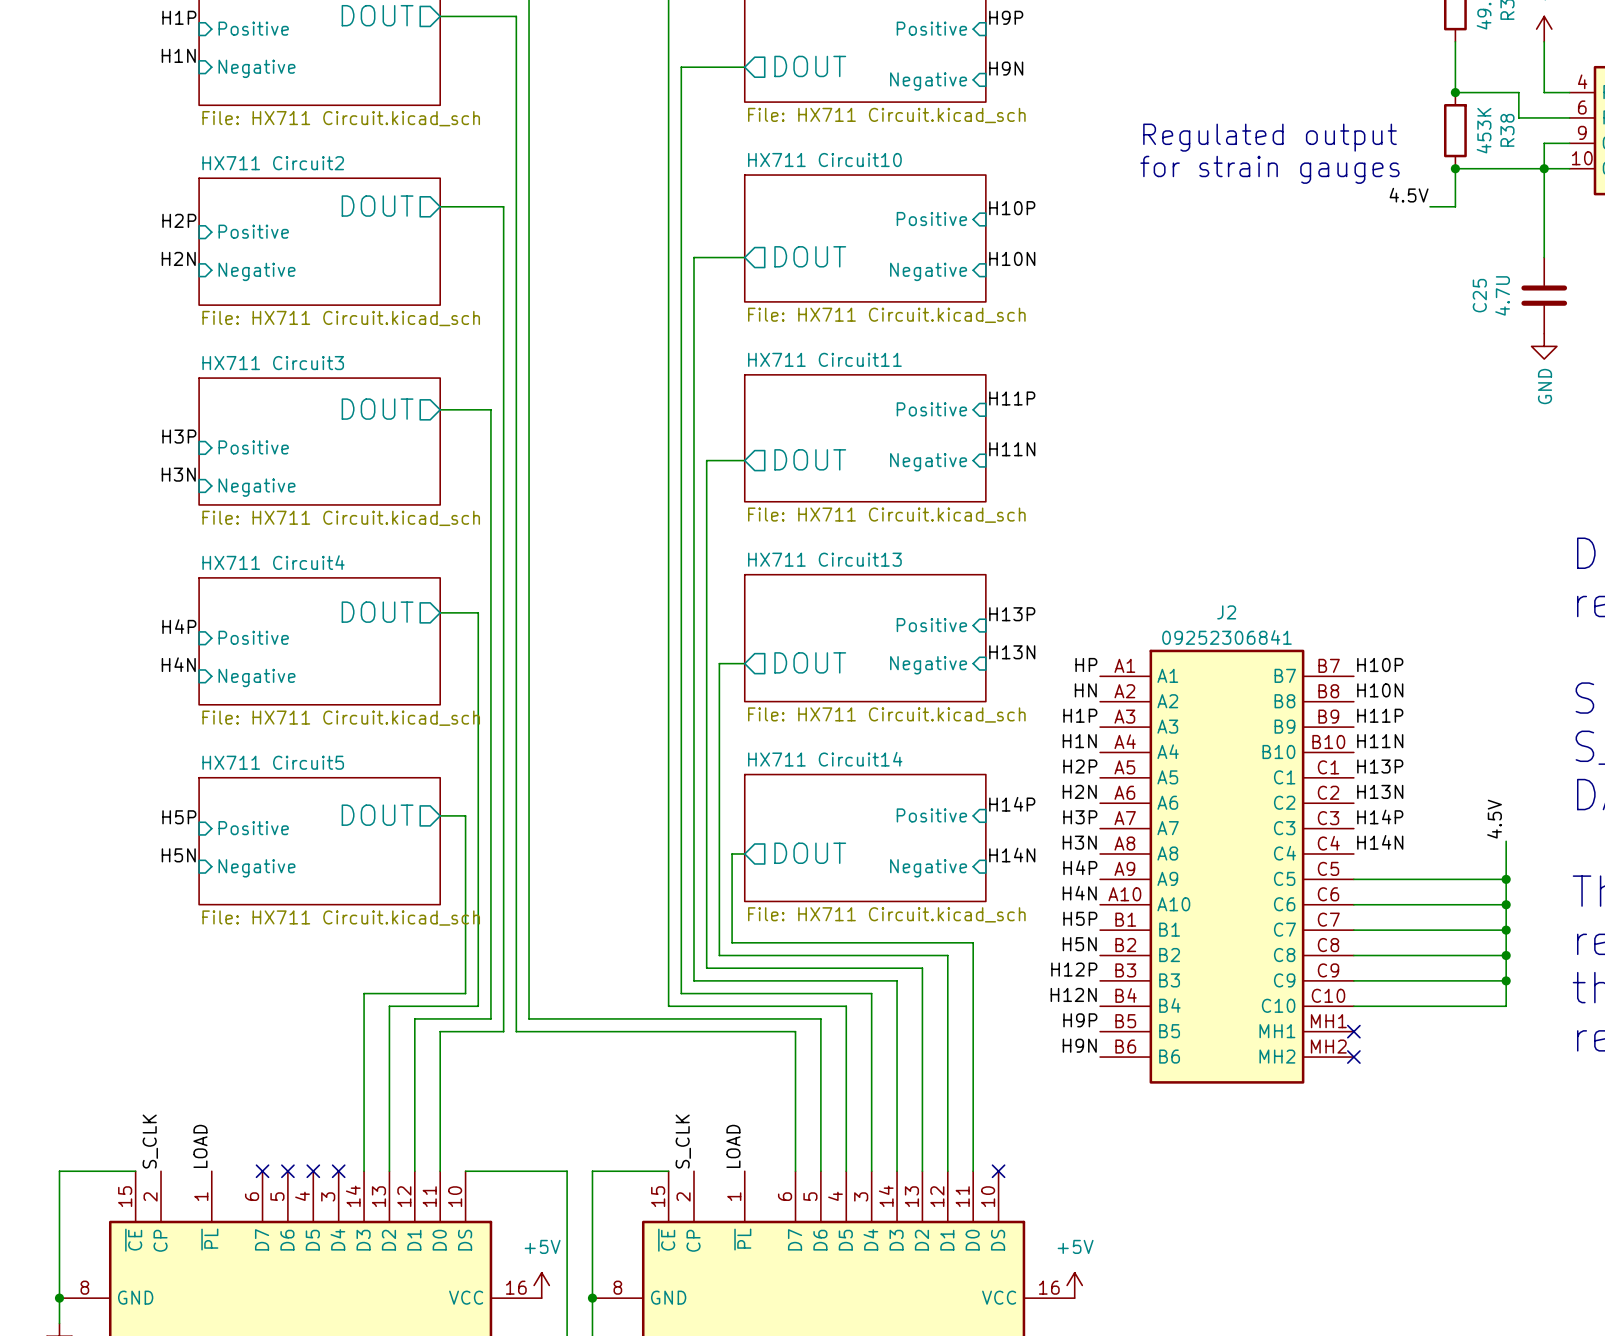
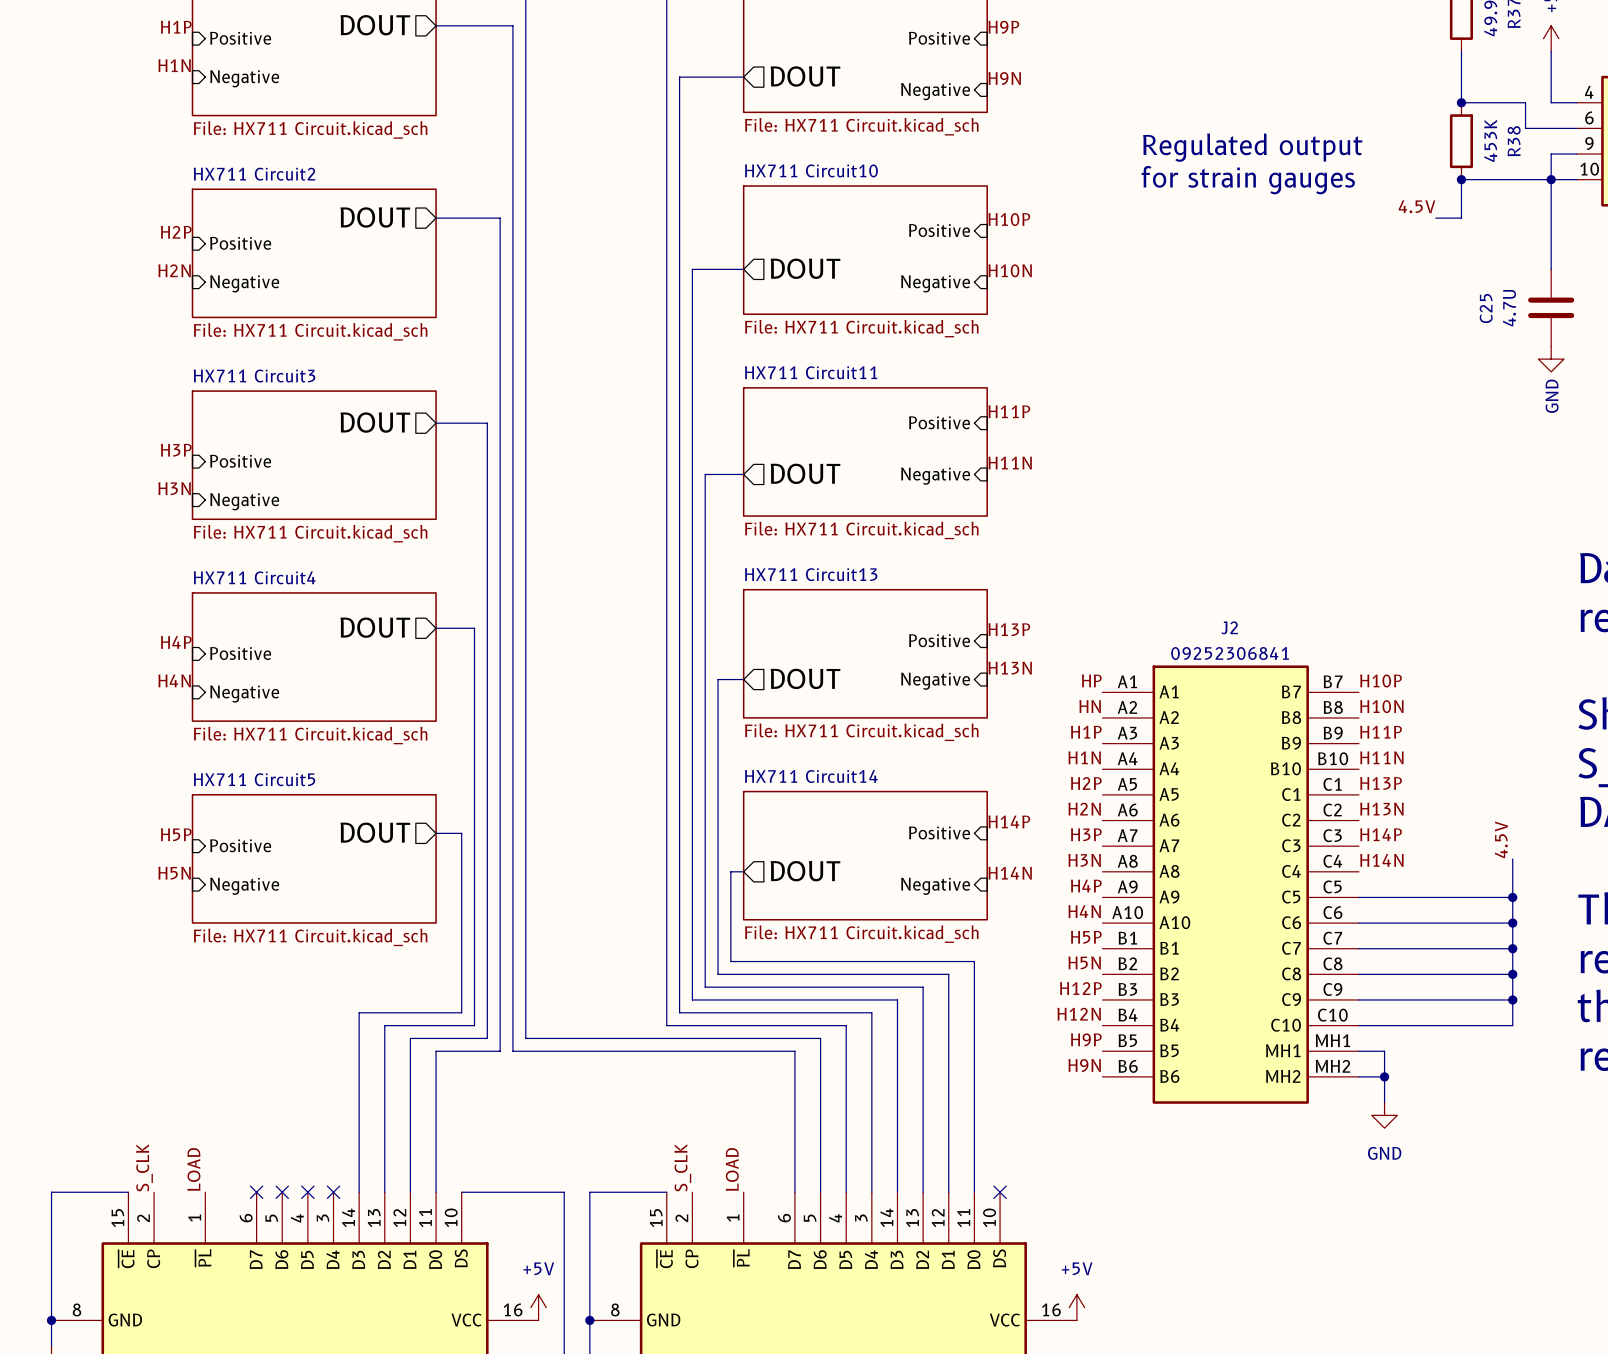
wire: none -> (1358, 1051) (1384, 1051) (1384, 1102)
no-connect mark: (1353, 1031) -> none
wire: none -> (1358, 1076) (1384, 1076)
no-connect mark: (1353, 1057) -> none
junction: none -> (1384, 1076)
power symbol: none -> GND (1384, 1115)

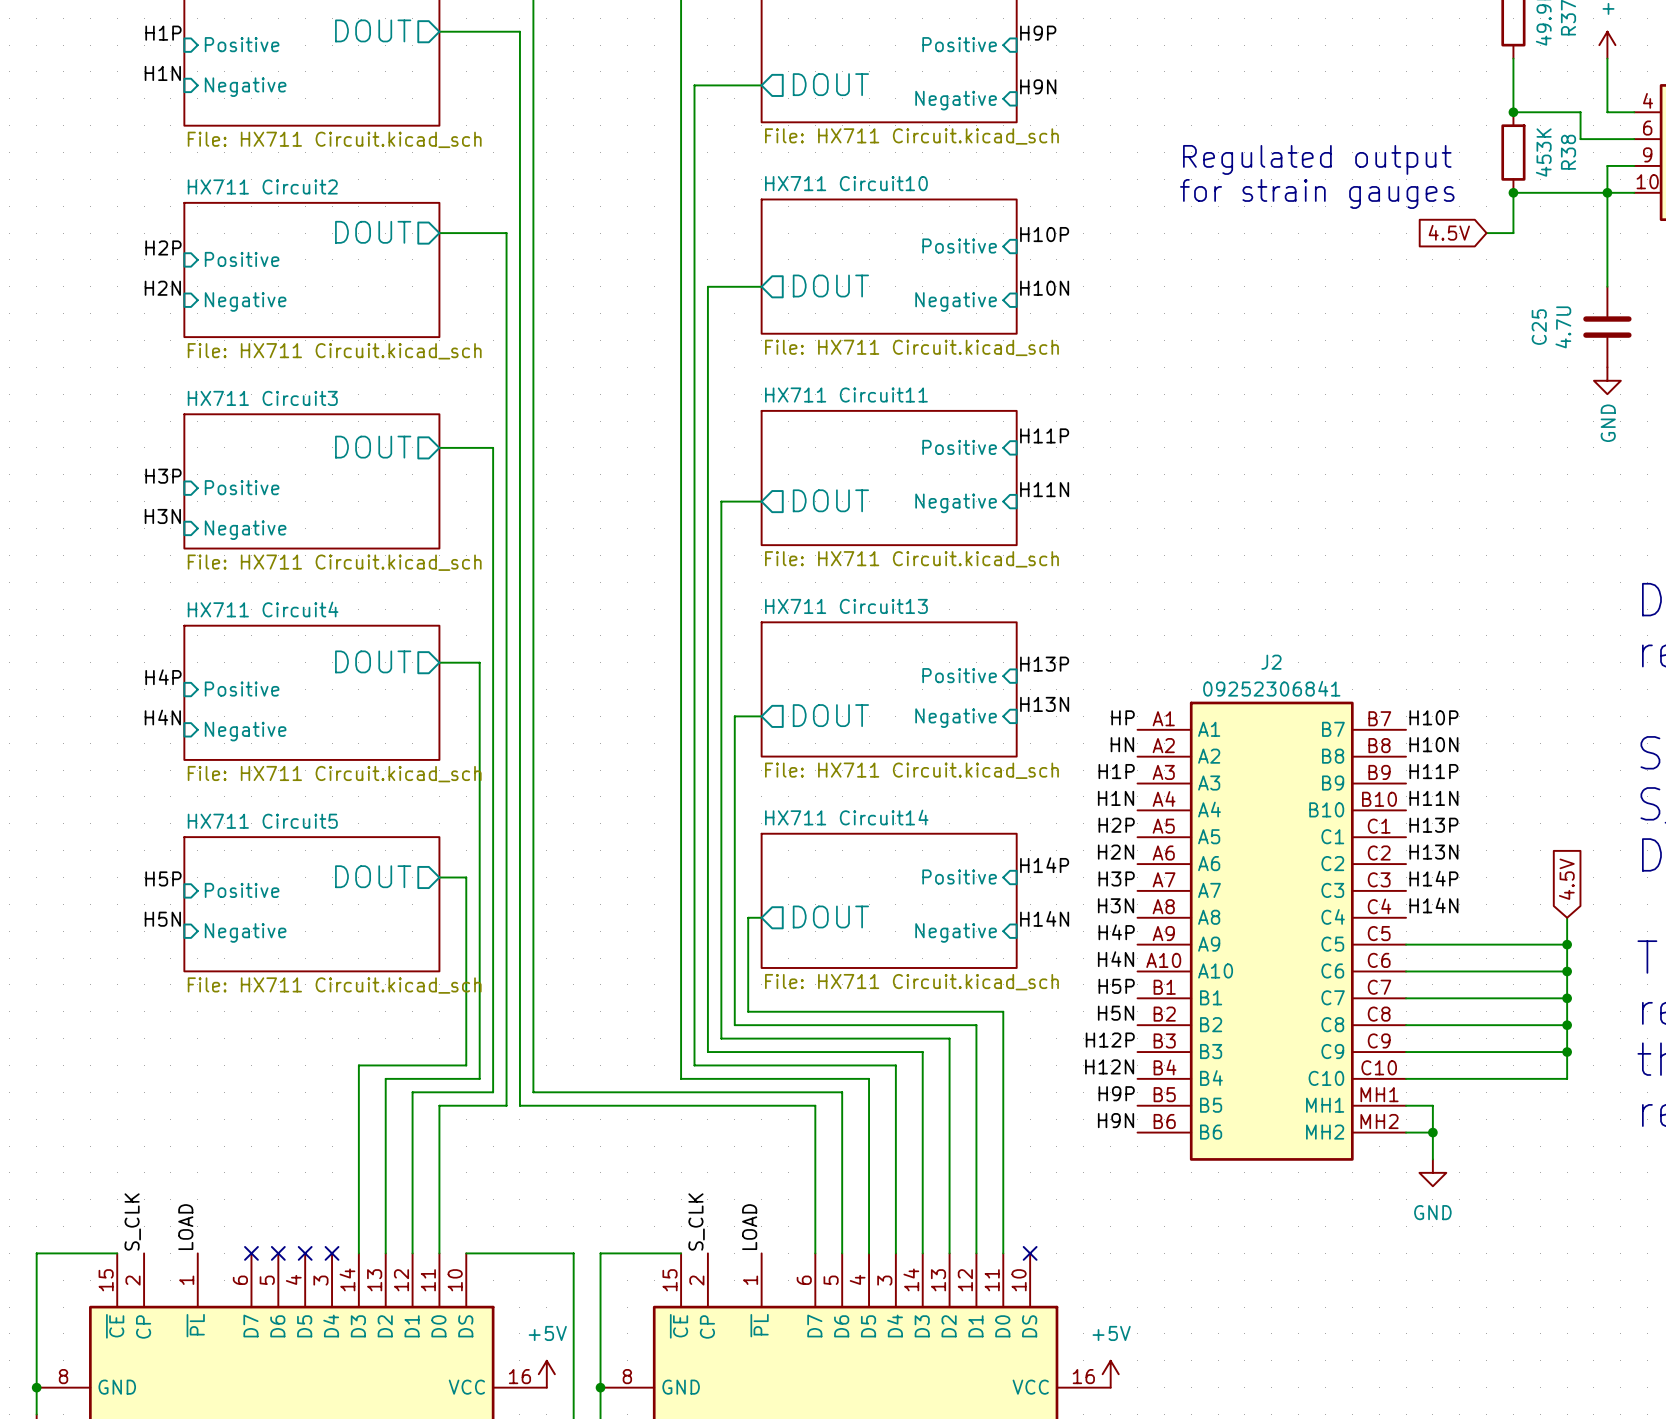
label: 4.5V (1417, 206) -> none
global label: none -> 4.5V (1449, 232)
global label: none -> 4.5V (1566, 879)
label: 4.5V (1501, 839) -> none
wire: (1512, 858) (1512, 871) -> none

